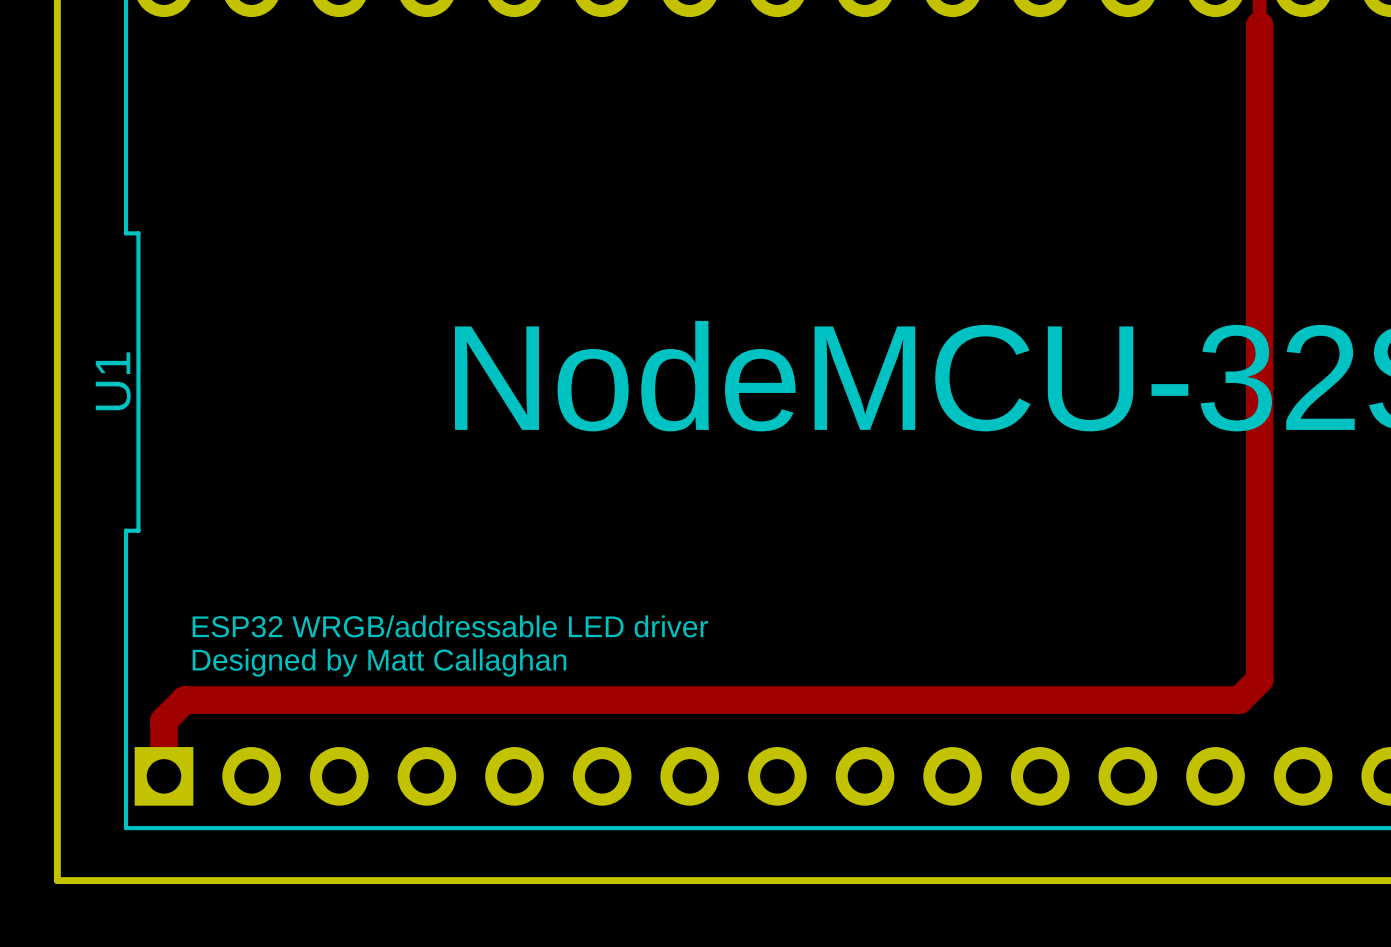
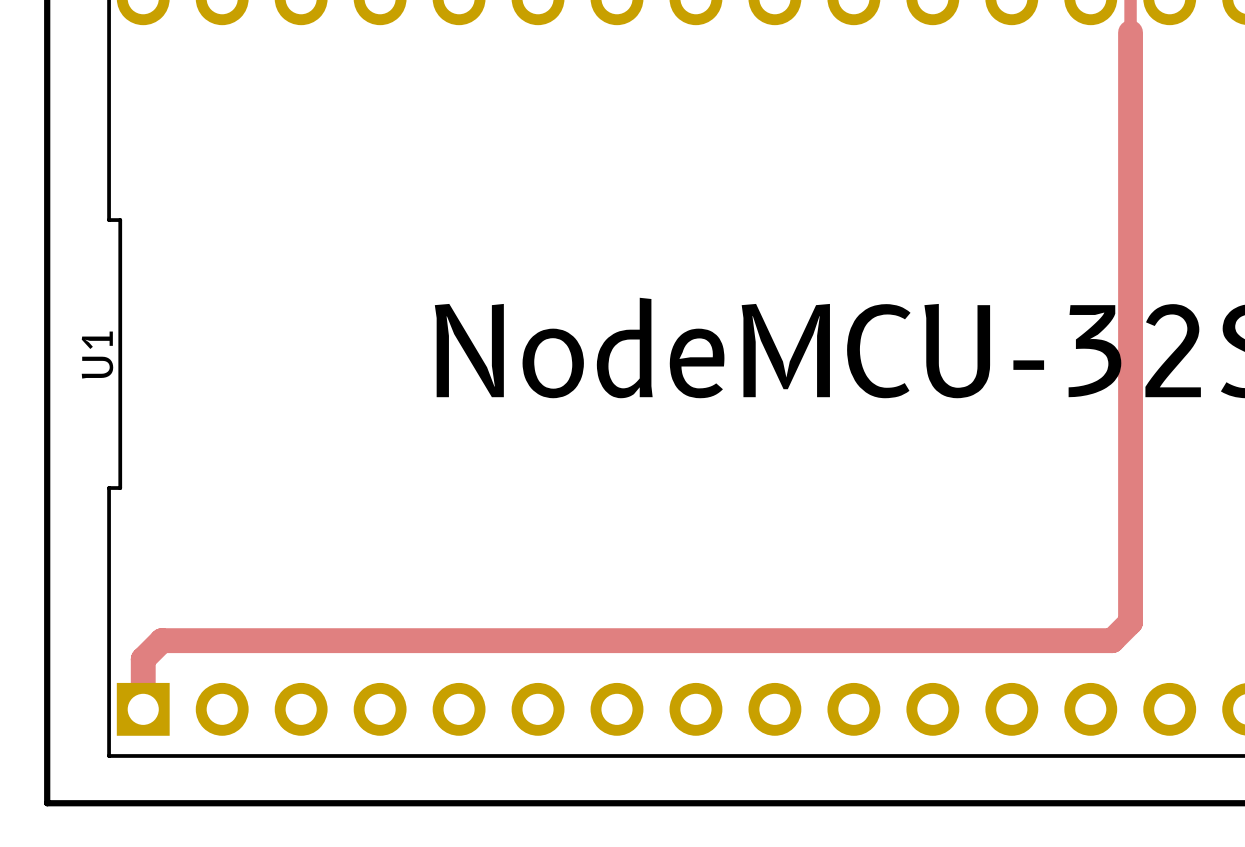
text: ESP32 WRGB/addressable LED driver (450, 626) -> none
text: Designed by Matt Callaghan (379, 662) -> none

